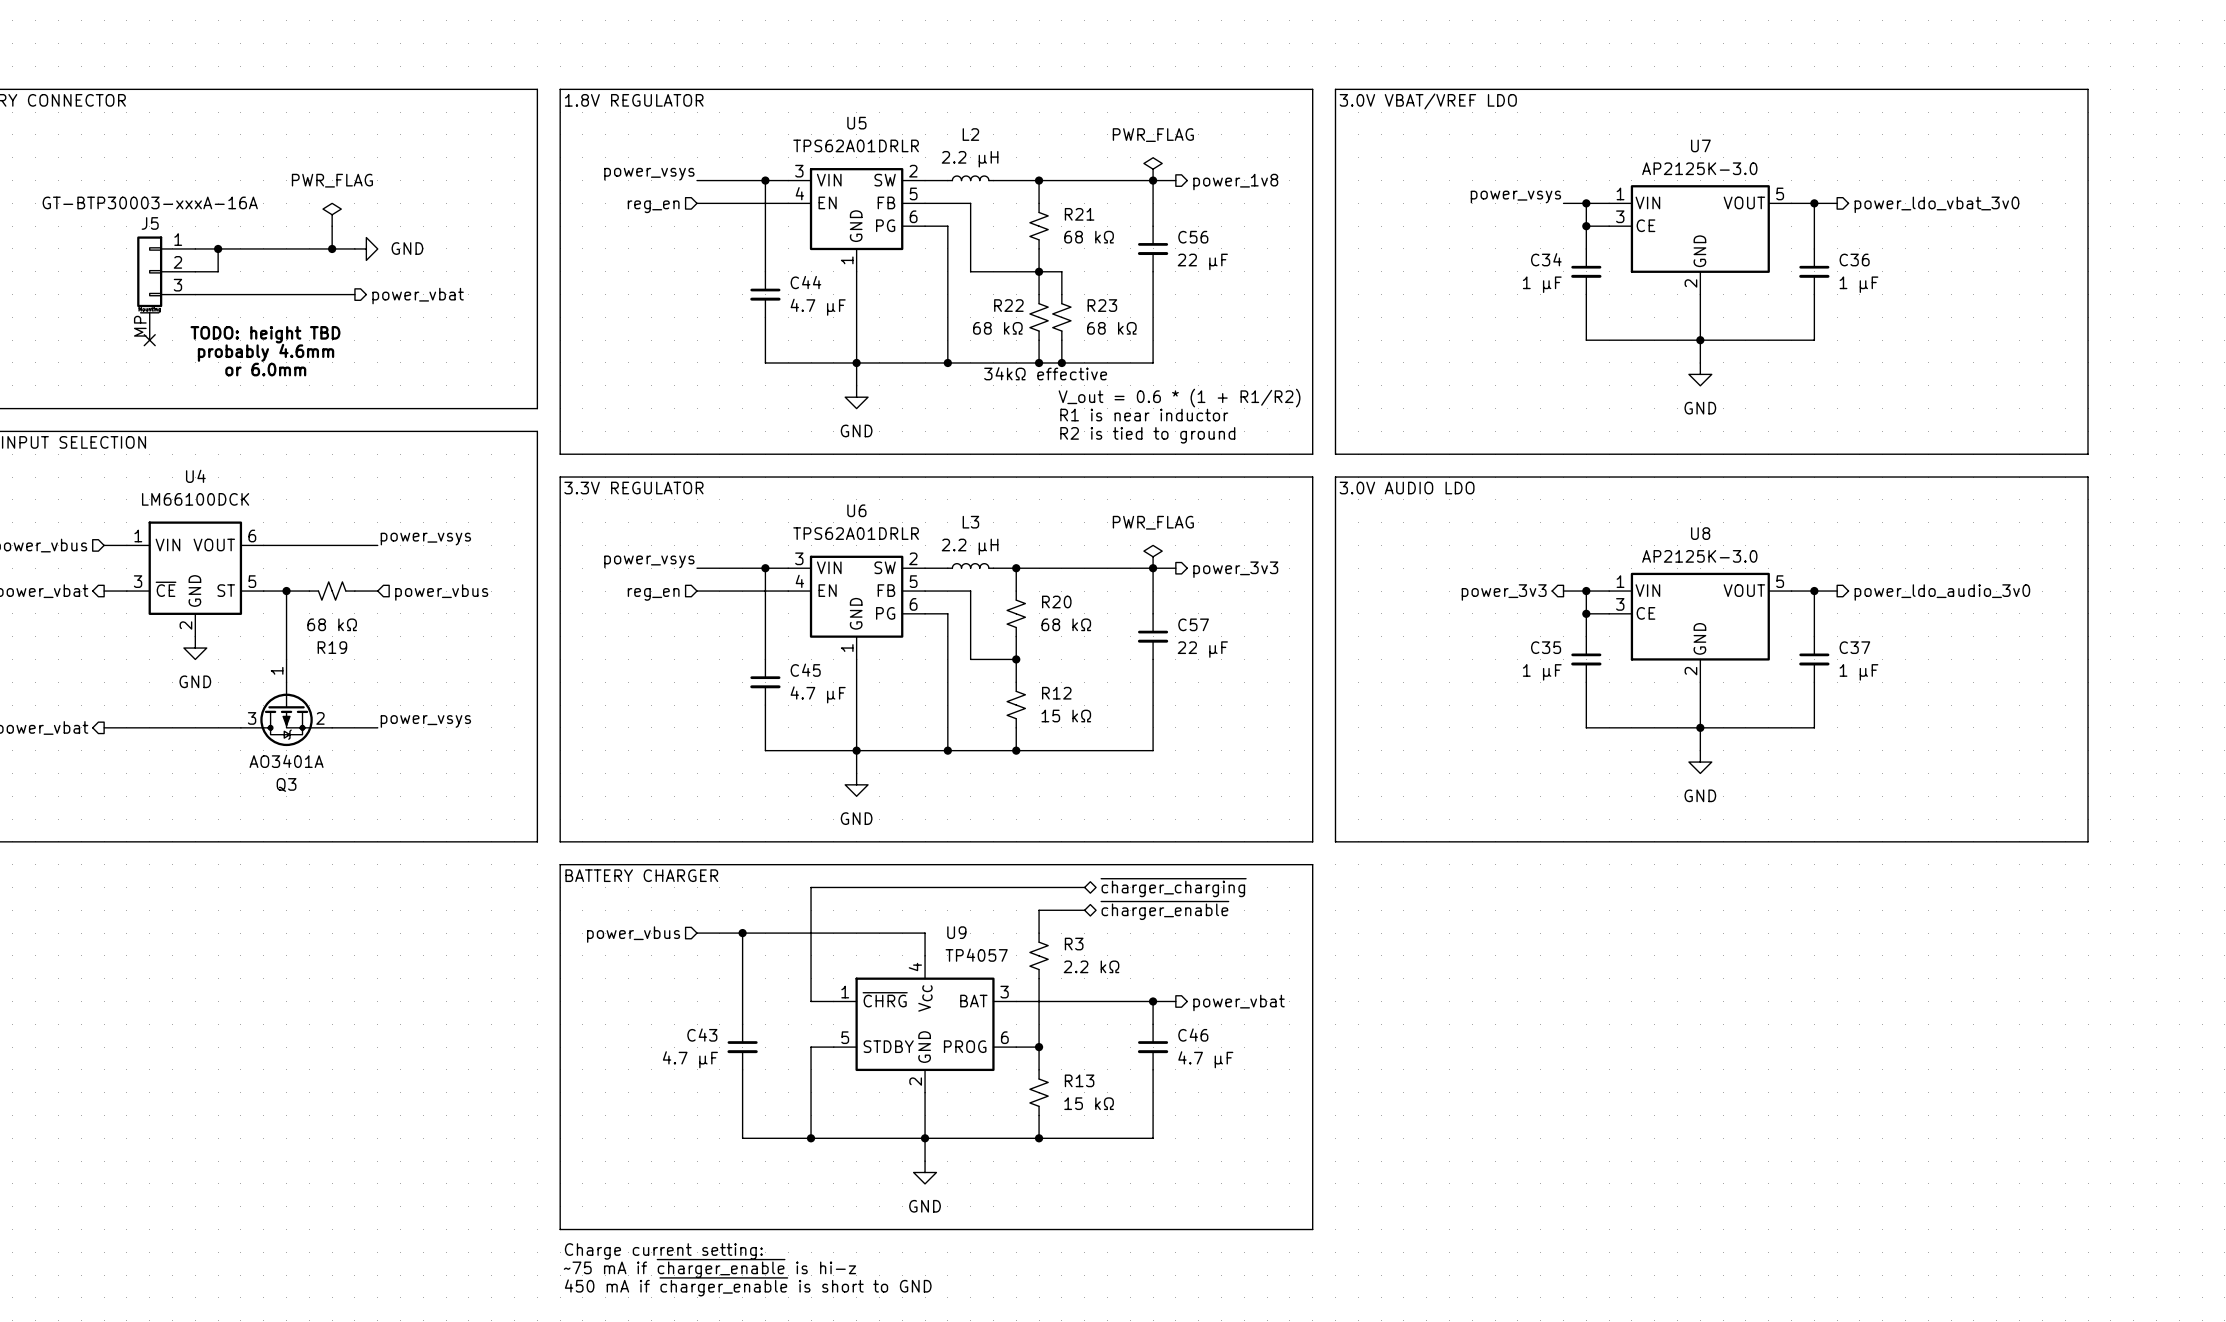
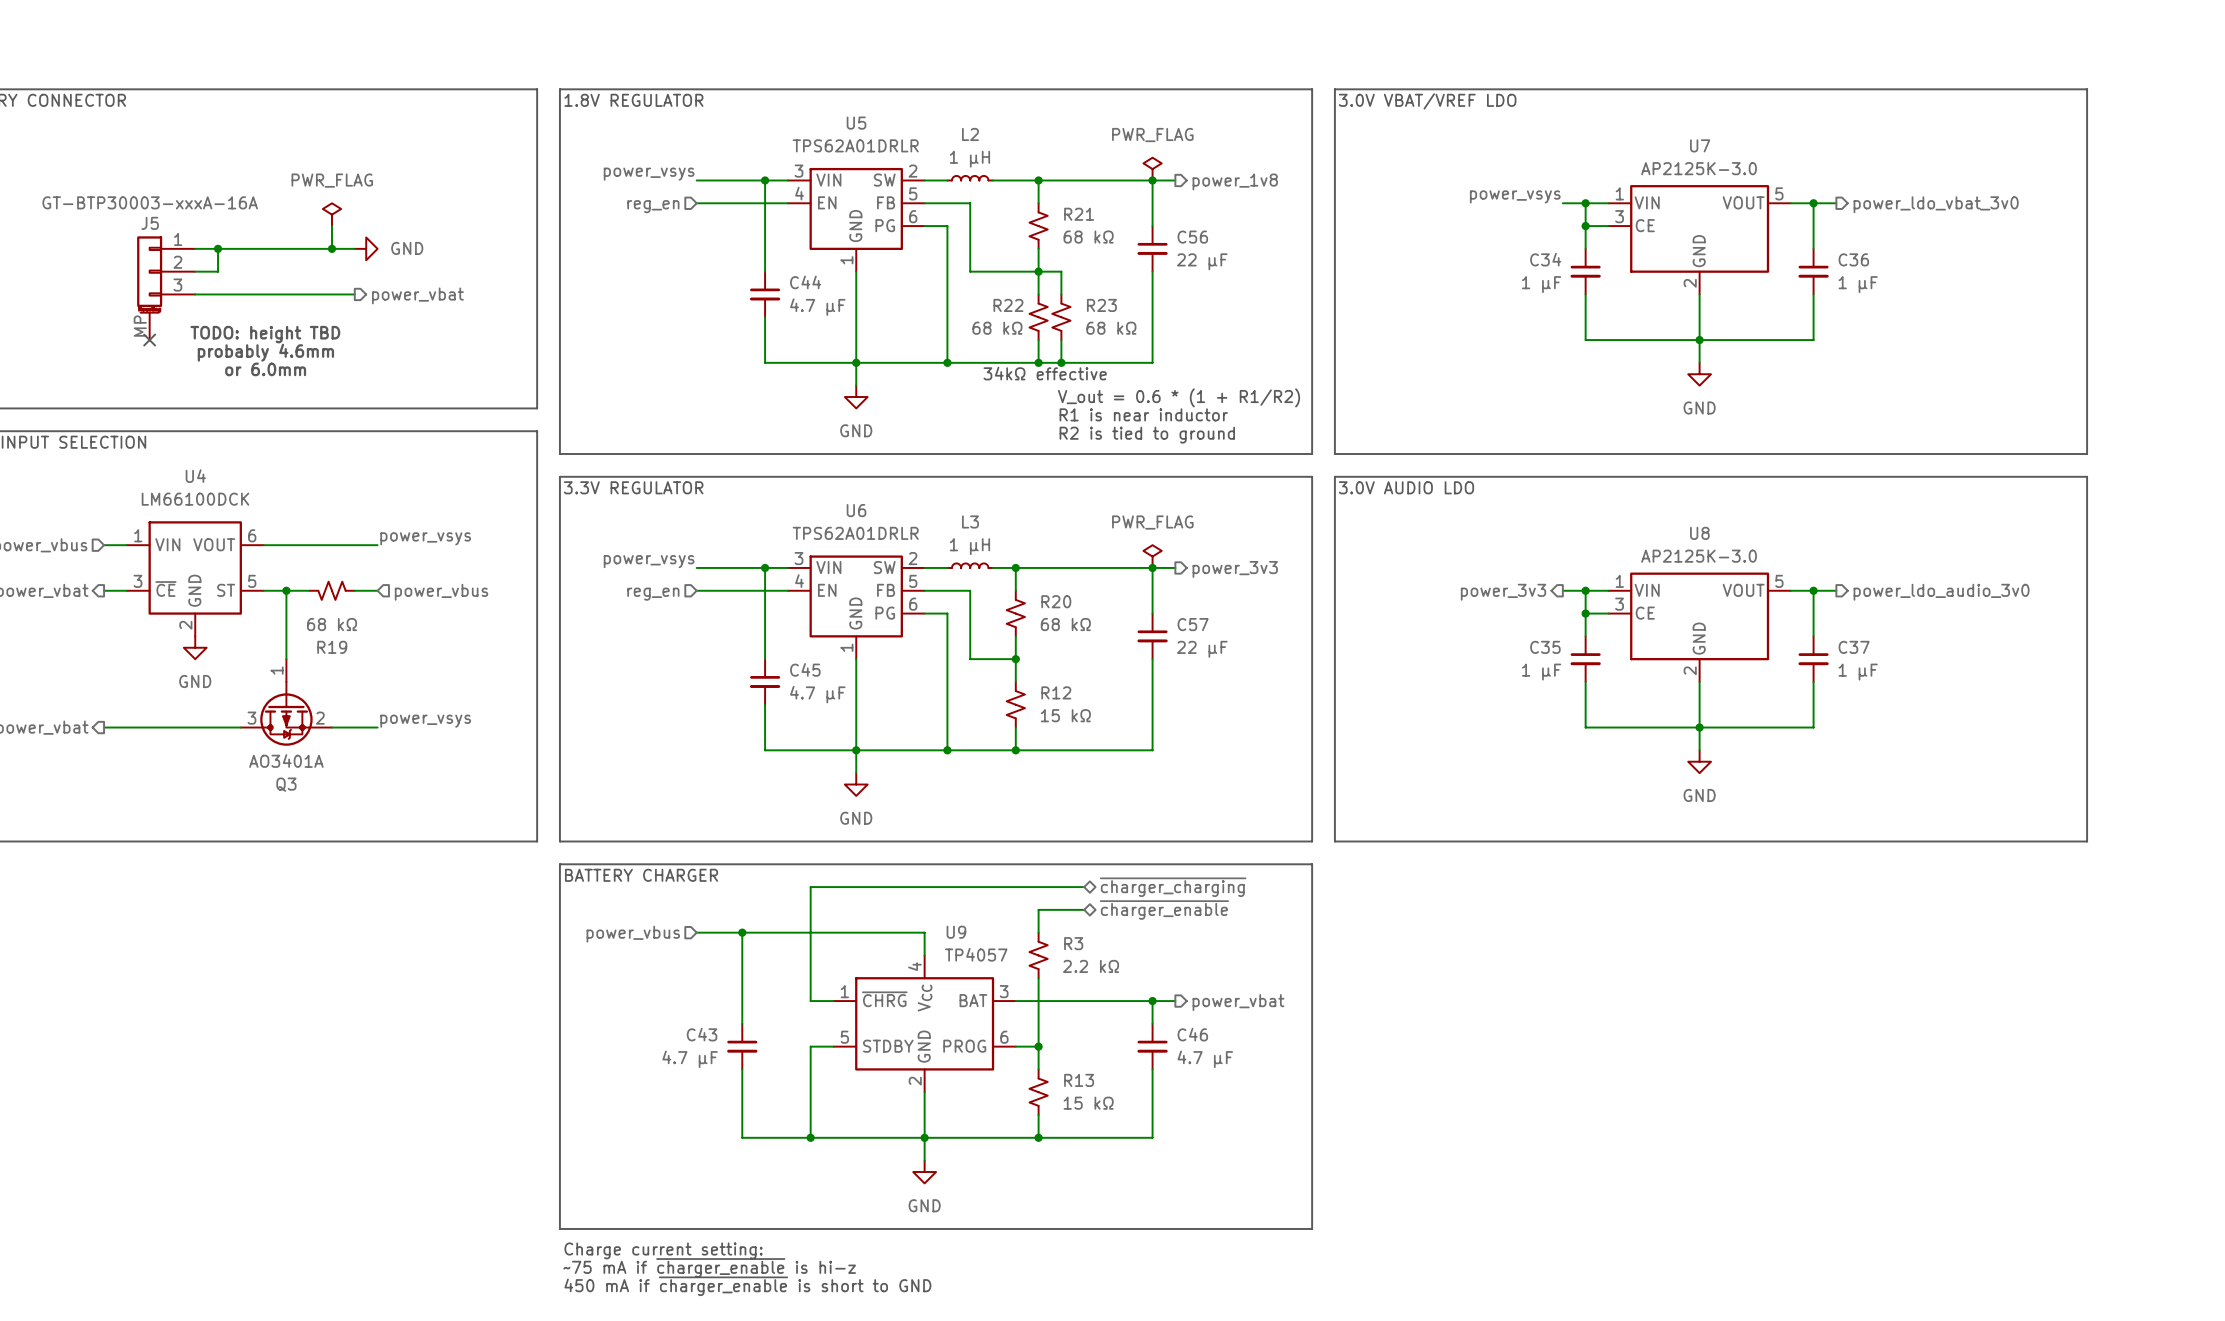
L2 value: 2.2 µH (970, 159) -> 1 µH (969, 159)
L3 value: 2.2 µH (970, 546) -> 1 µH (969, 546)

